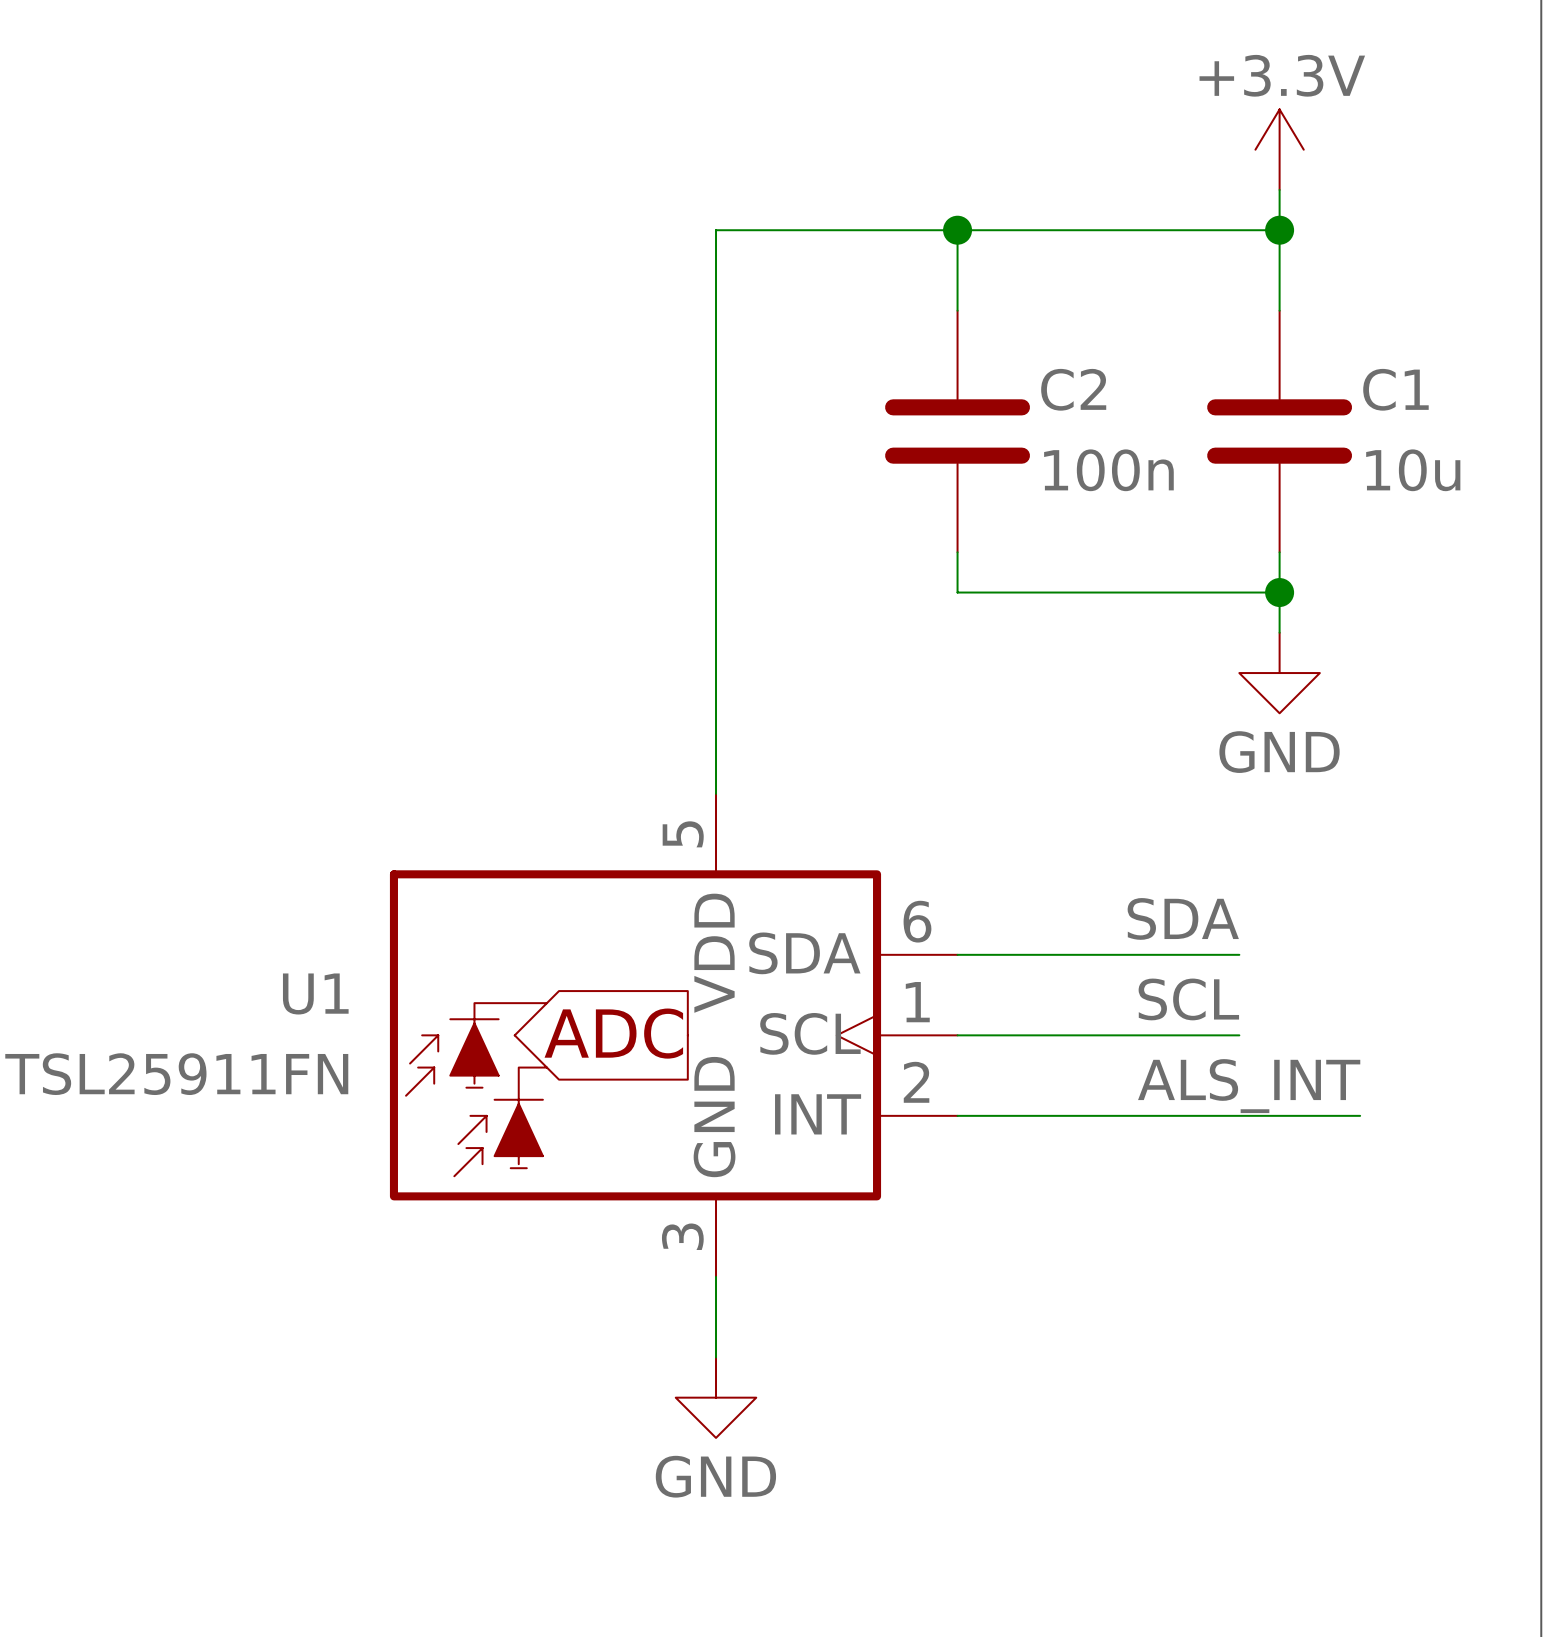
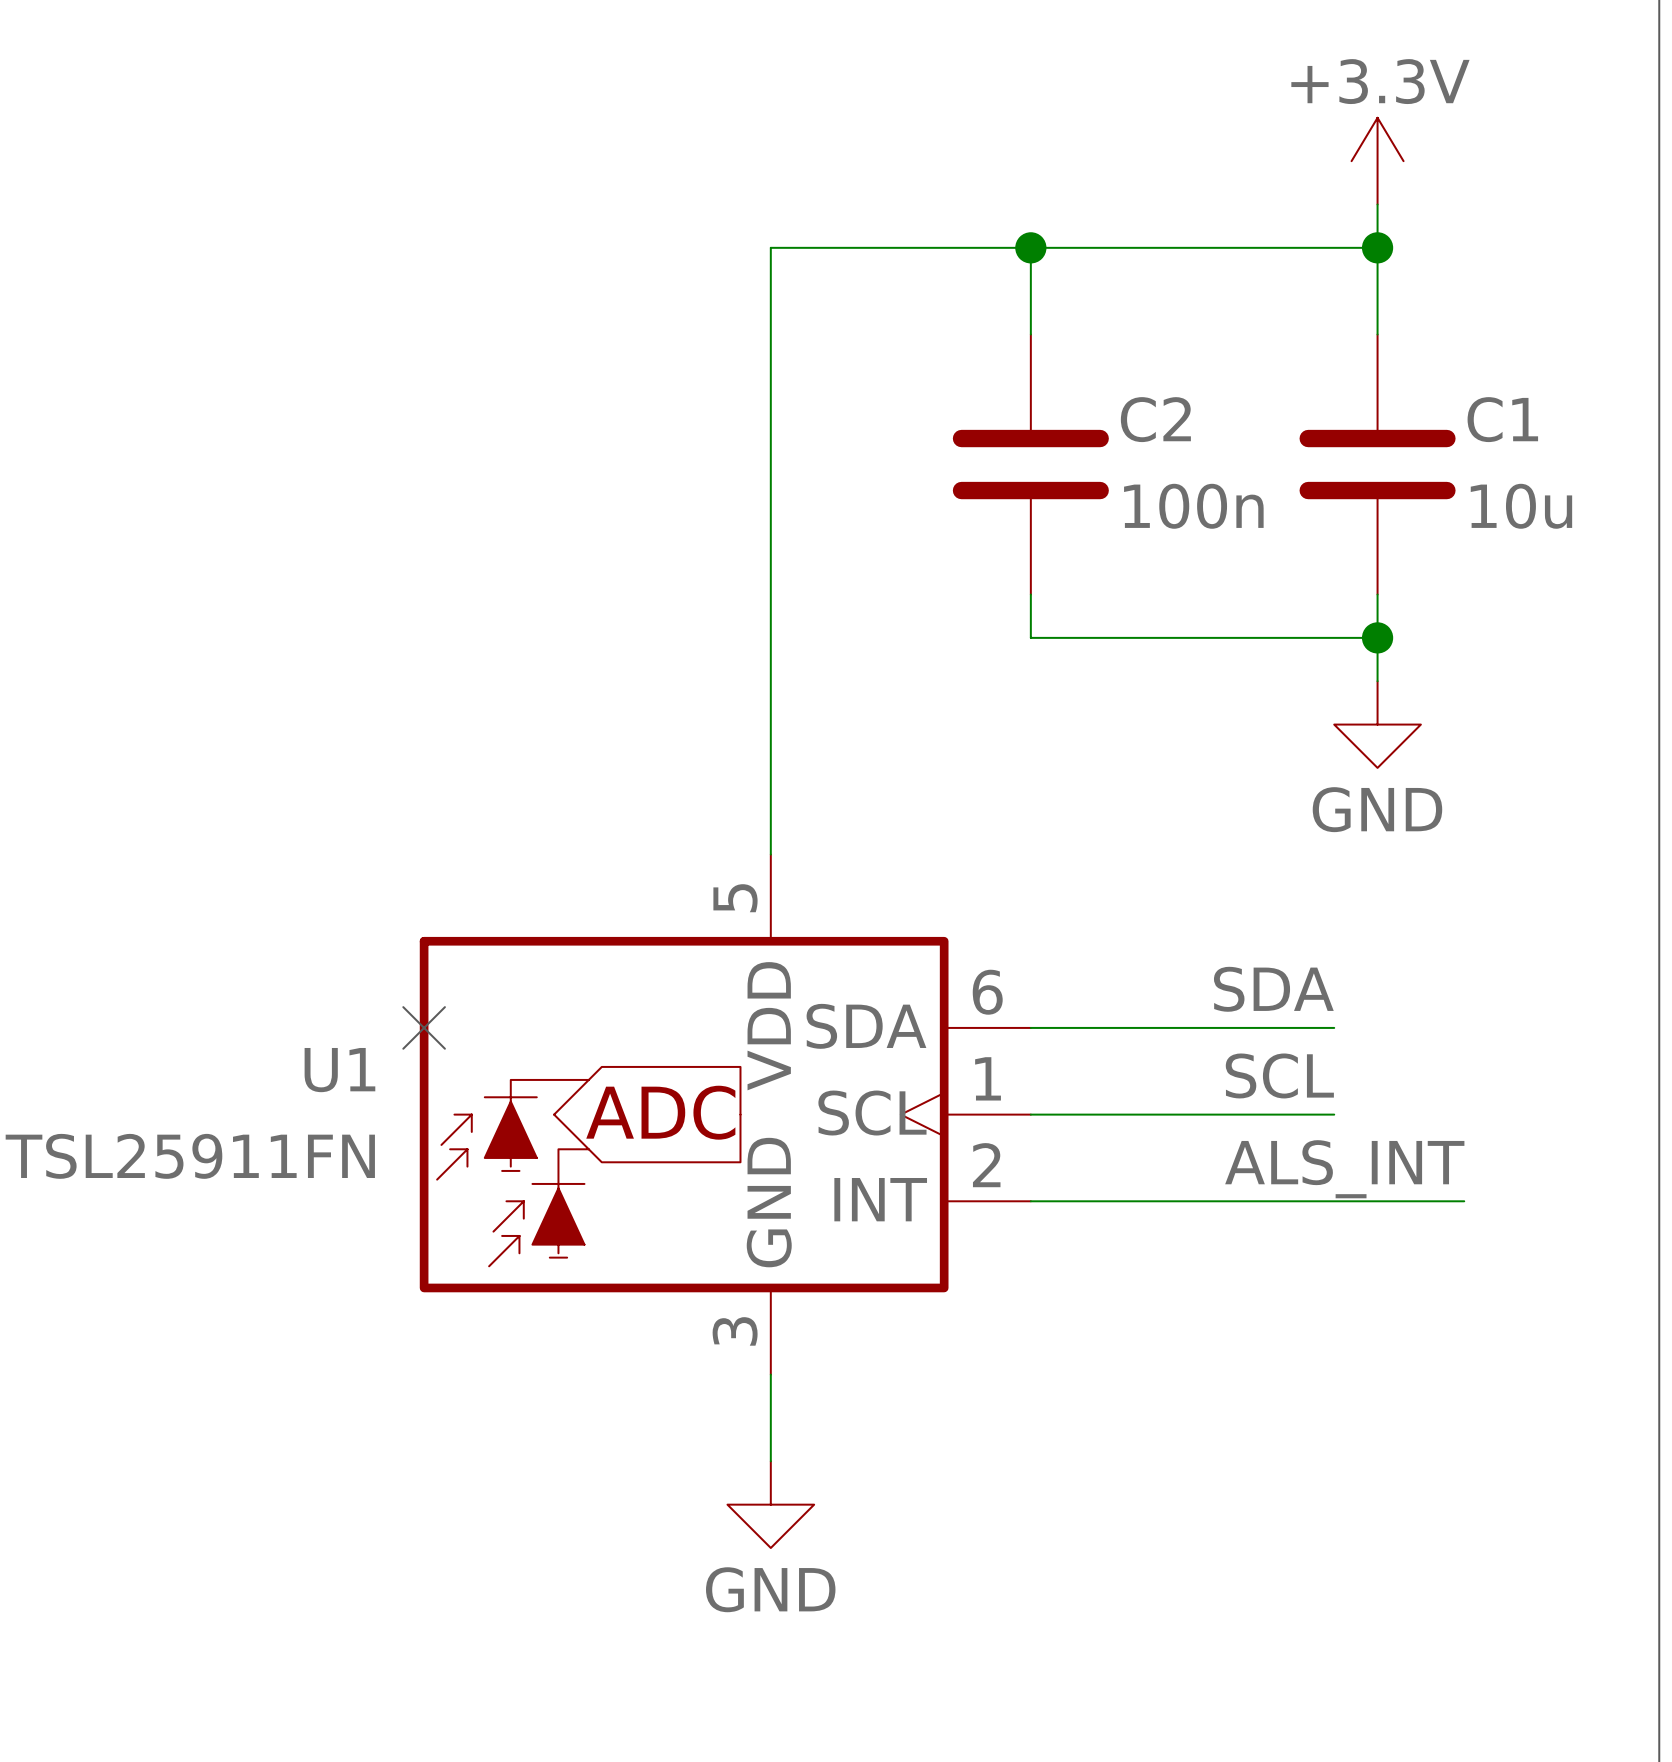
no-connect mark: none -> (424, 1027)

